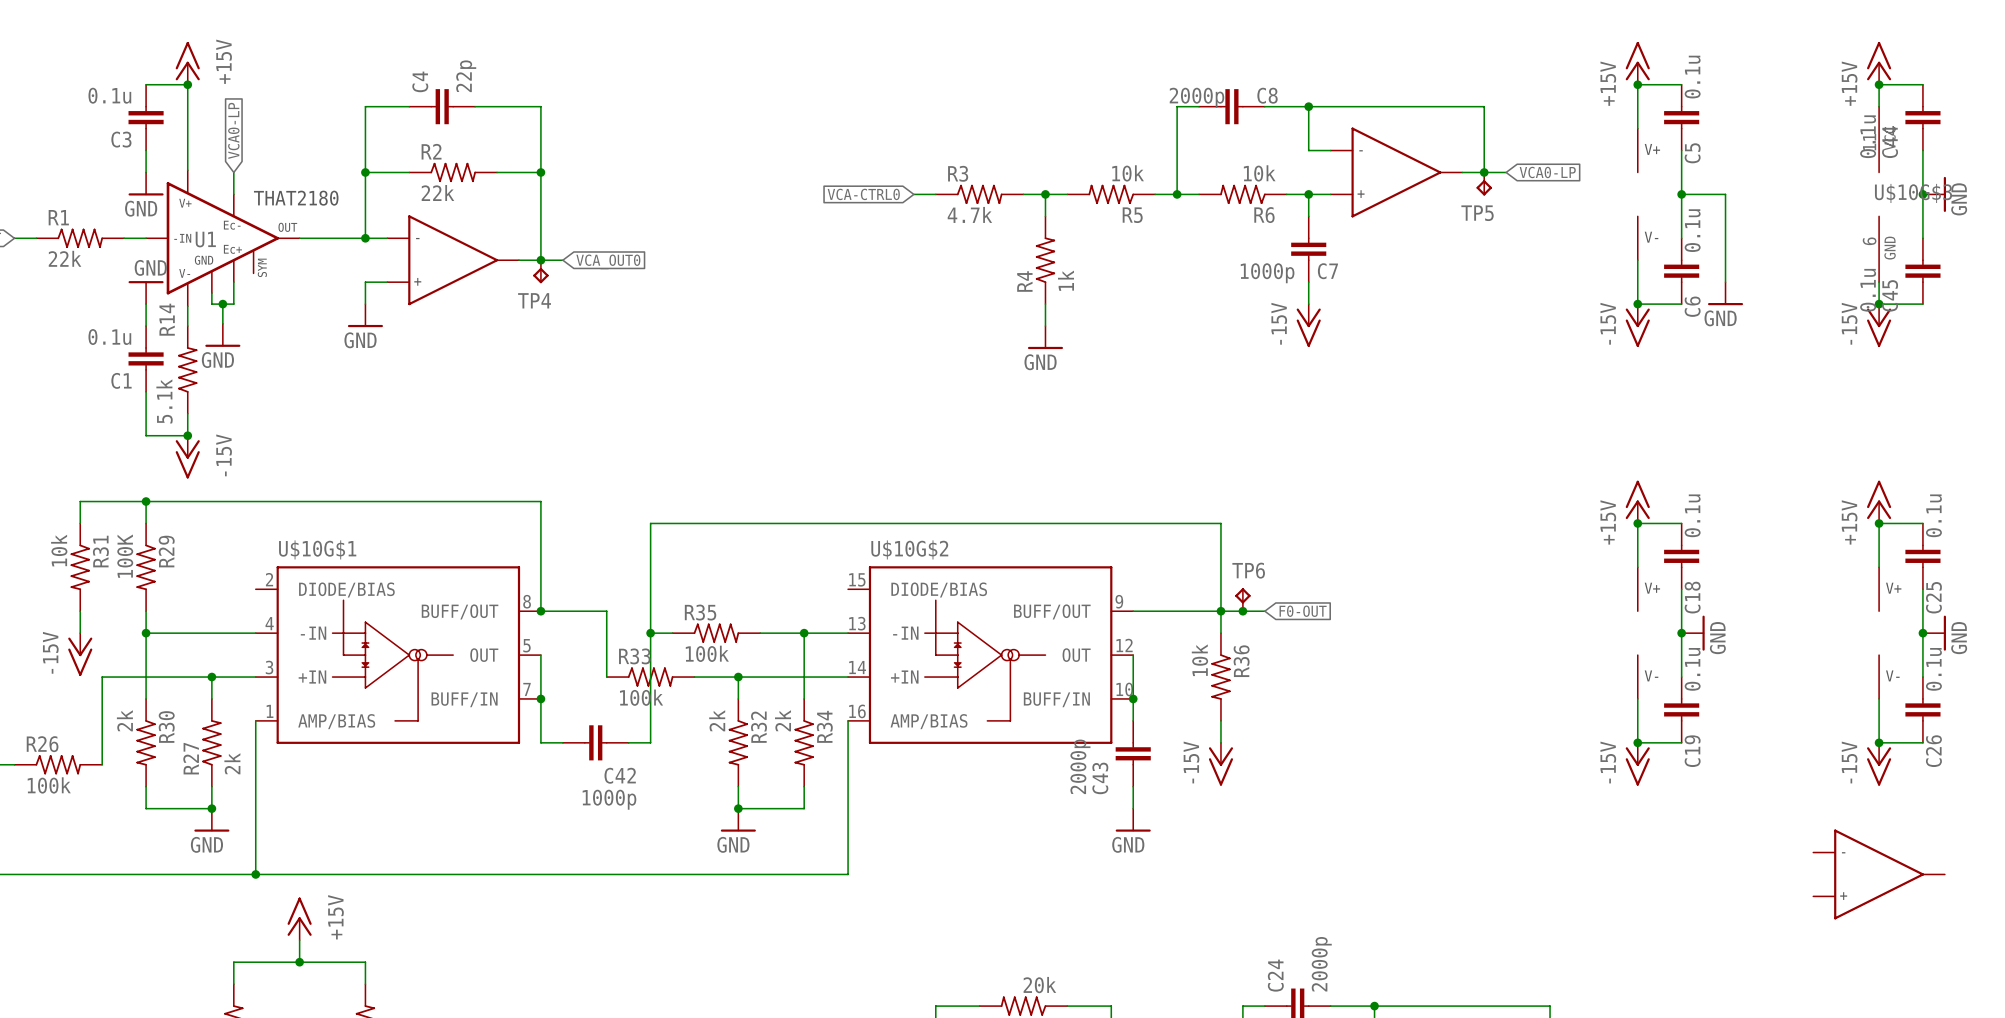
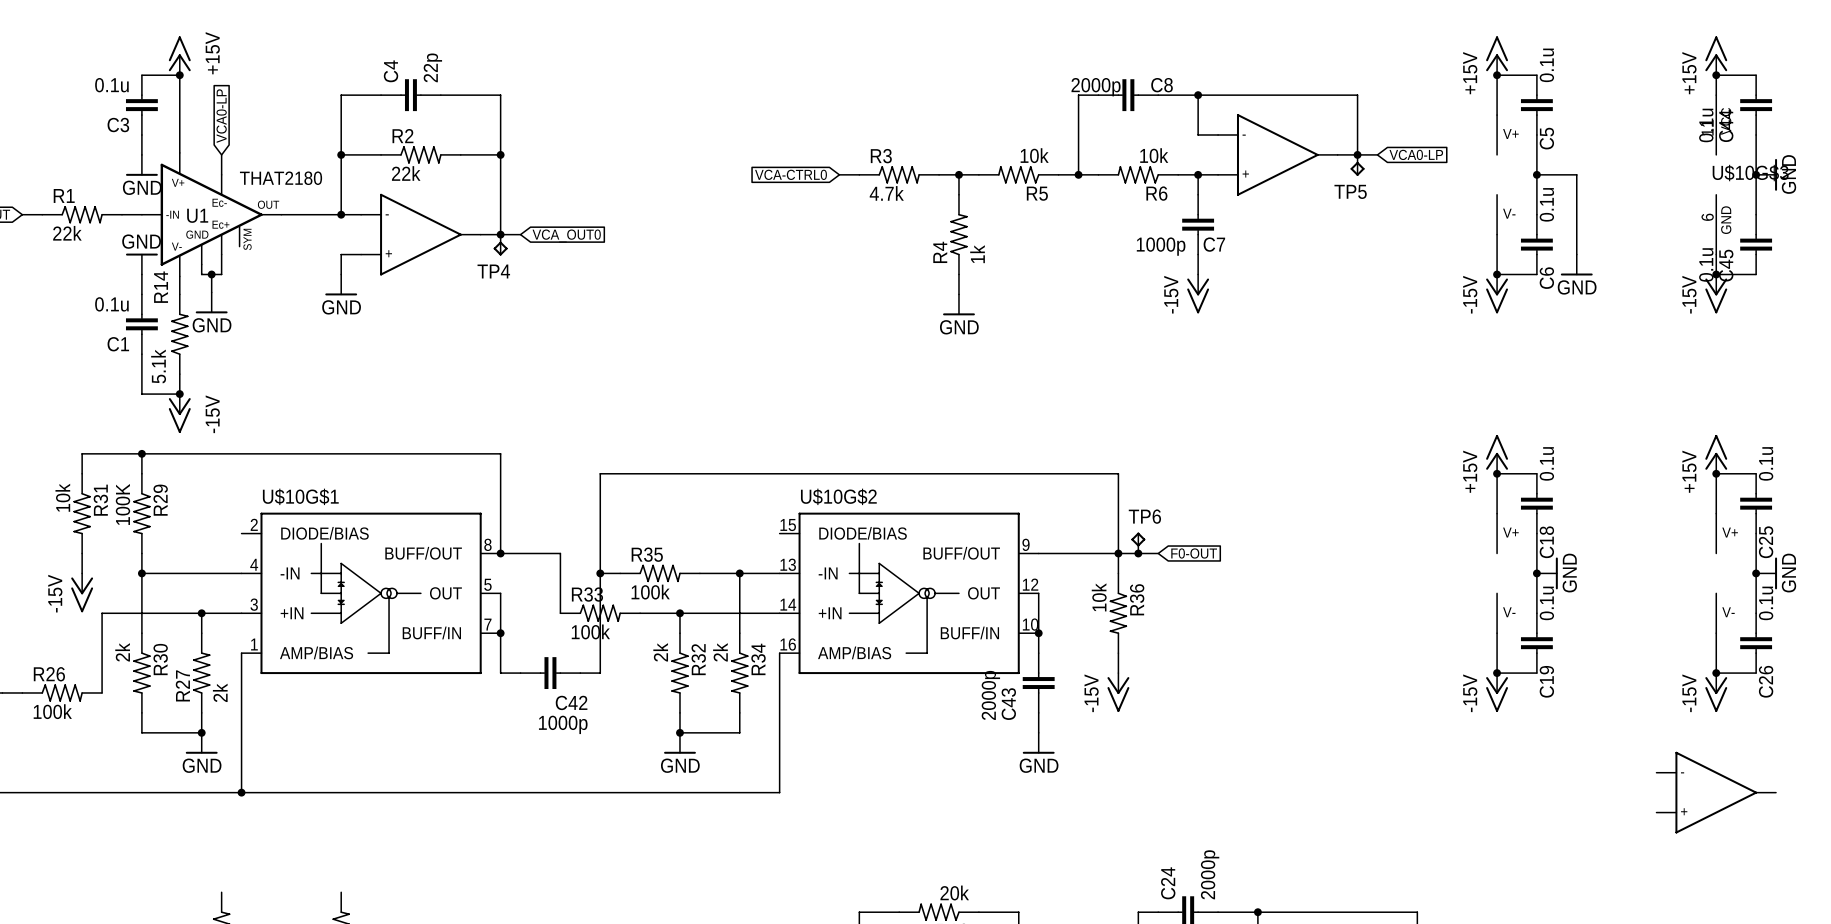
power symbol: +15V (299, 918) -> none
wire: (299, 940) (299, 962) -> none
junction: (299, 962) -> none
wire: (233, 984) (233, 962) (365, 962) (365, 984) -> none

